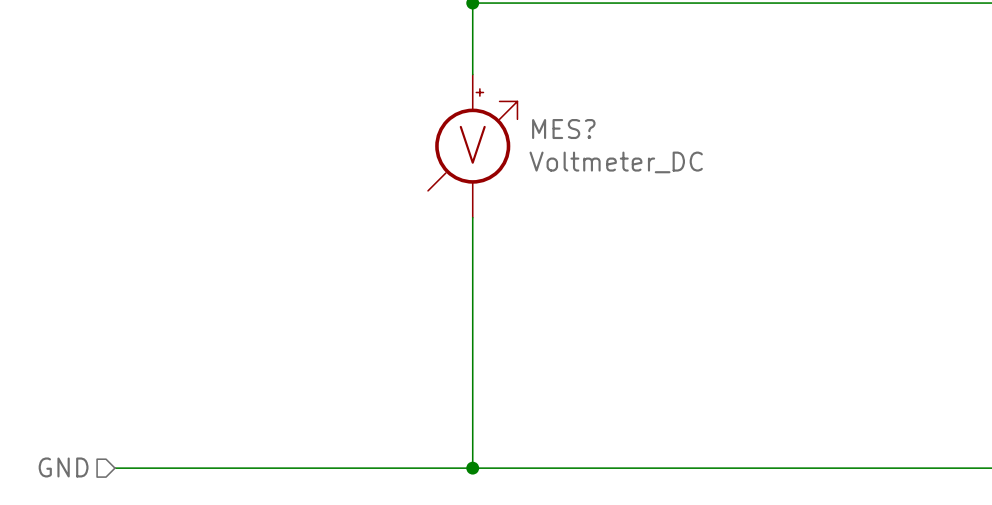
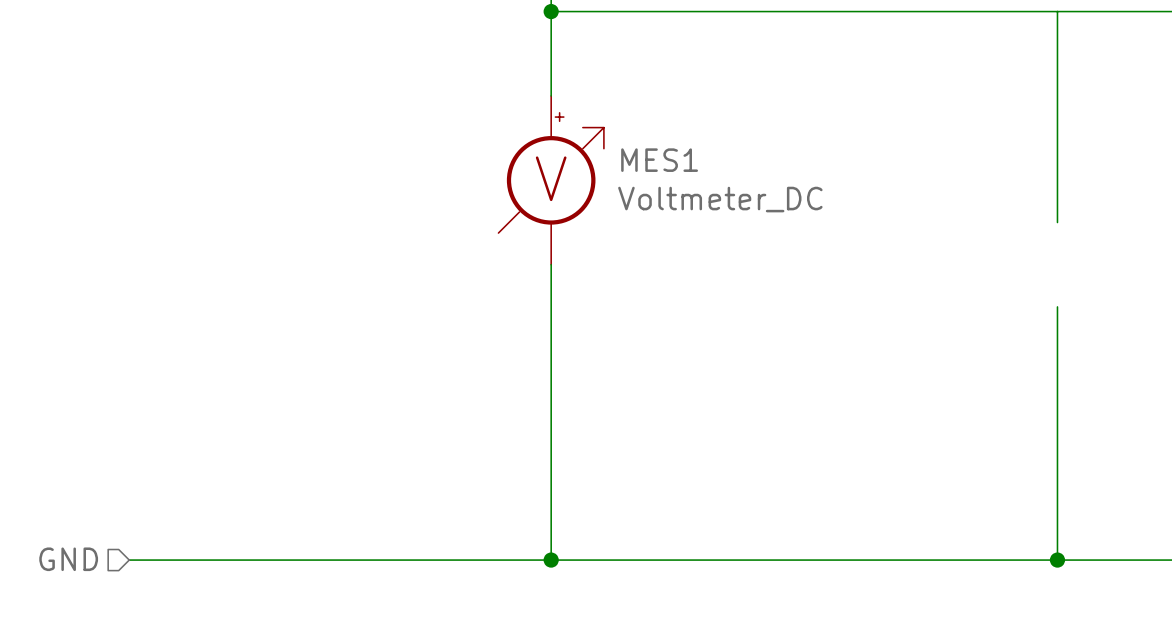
wire: none -> (1057, 11) (1057, 222)
MES? name: MES? (563, 129) -> MES1 (659, 160)
wire: none -> (1057, 306) (1057, 560)
junction: none -> (1057, 560)

